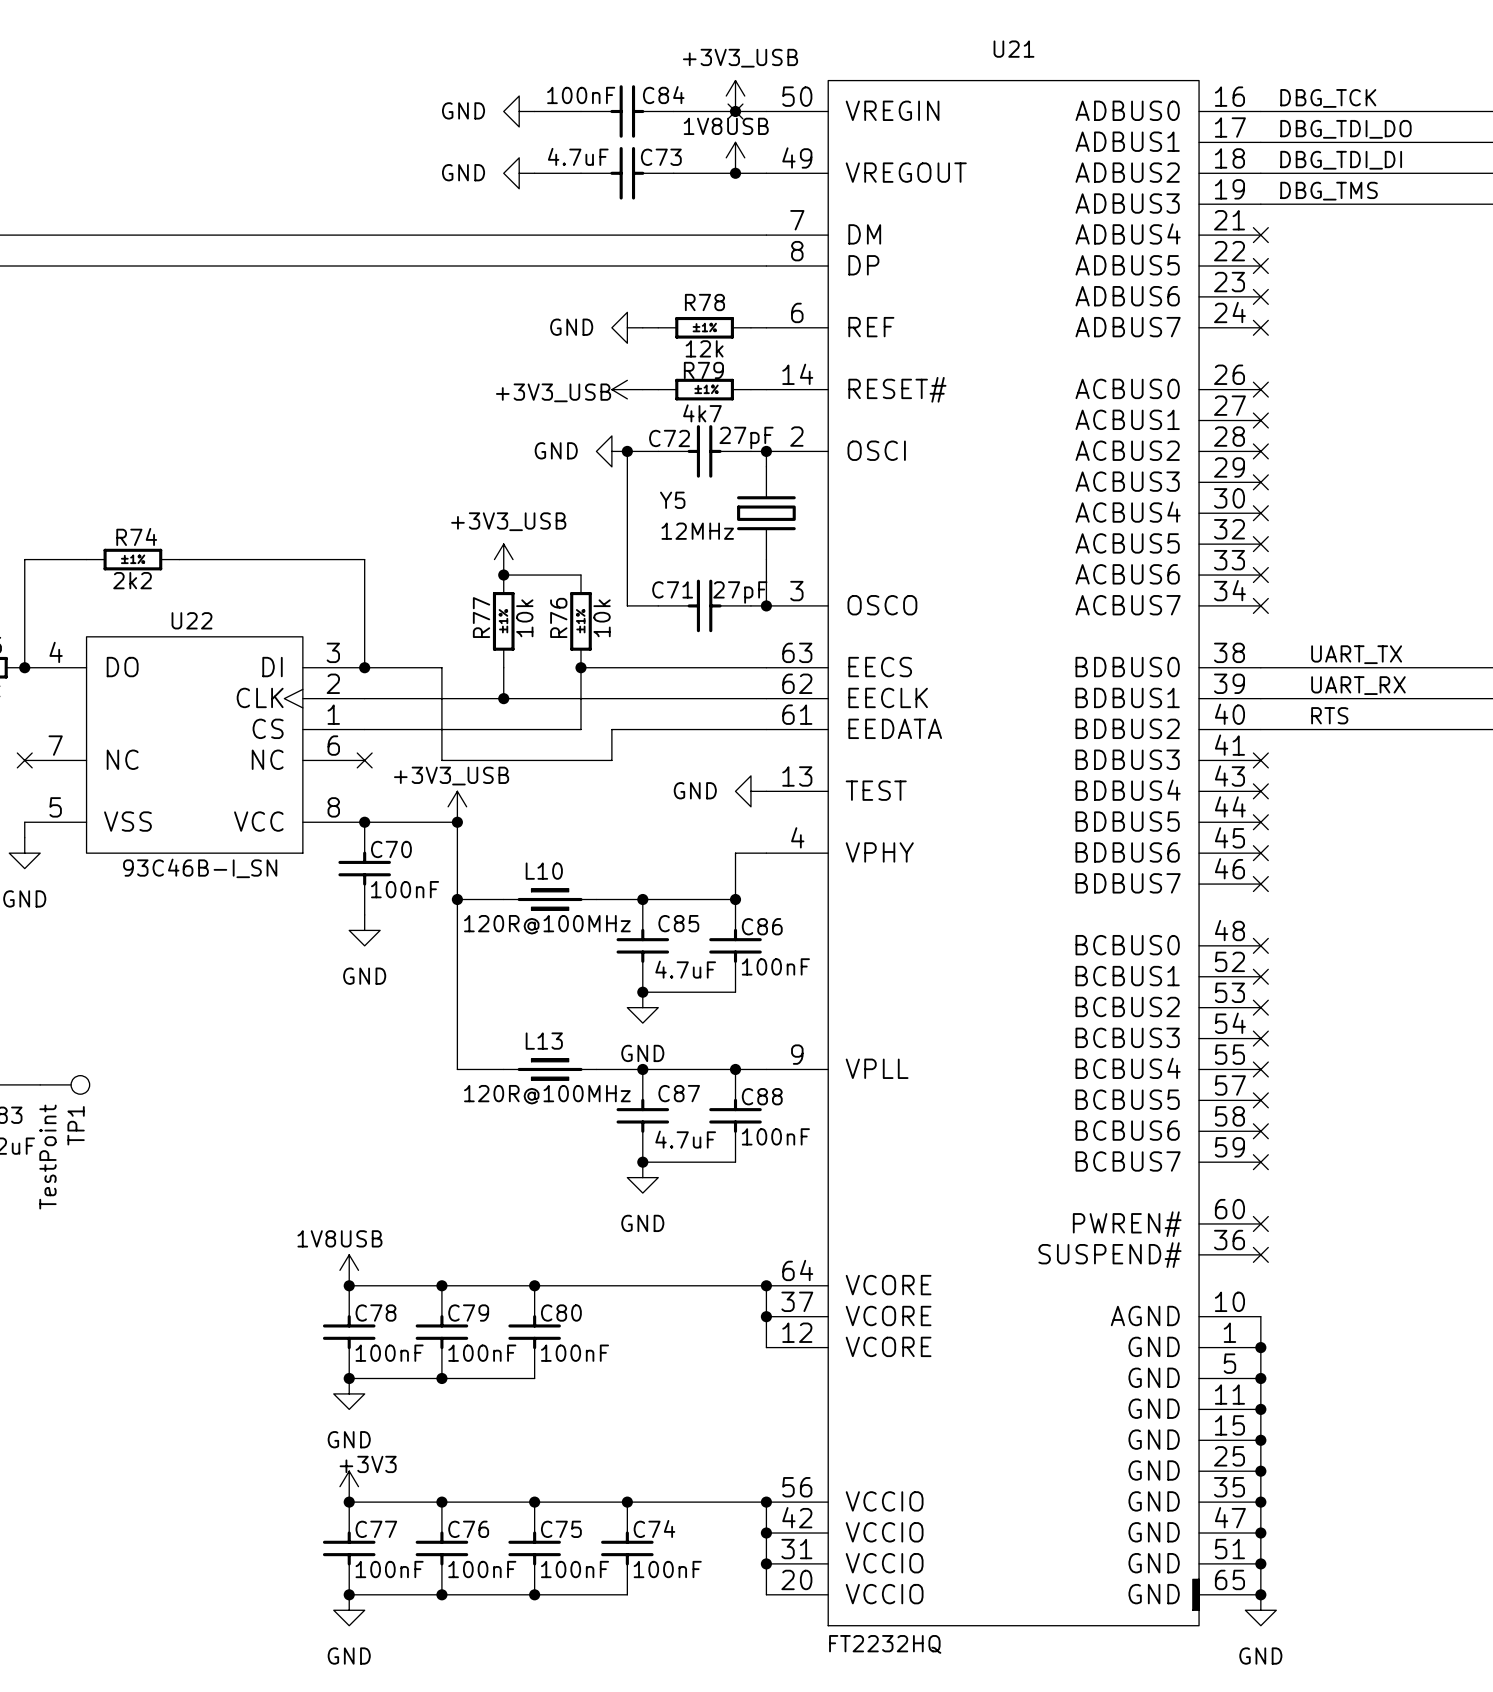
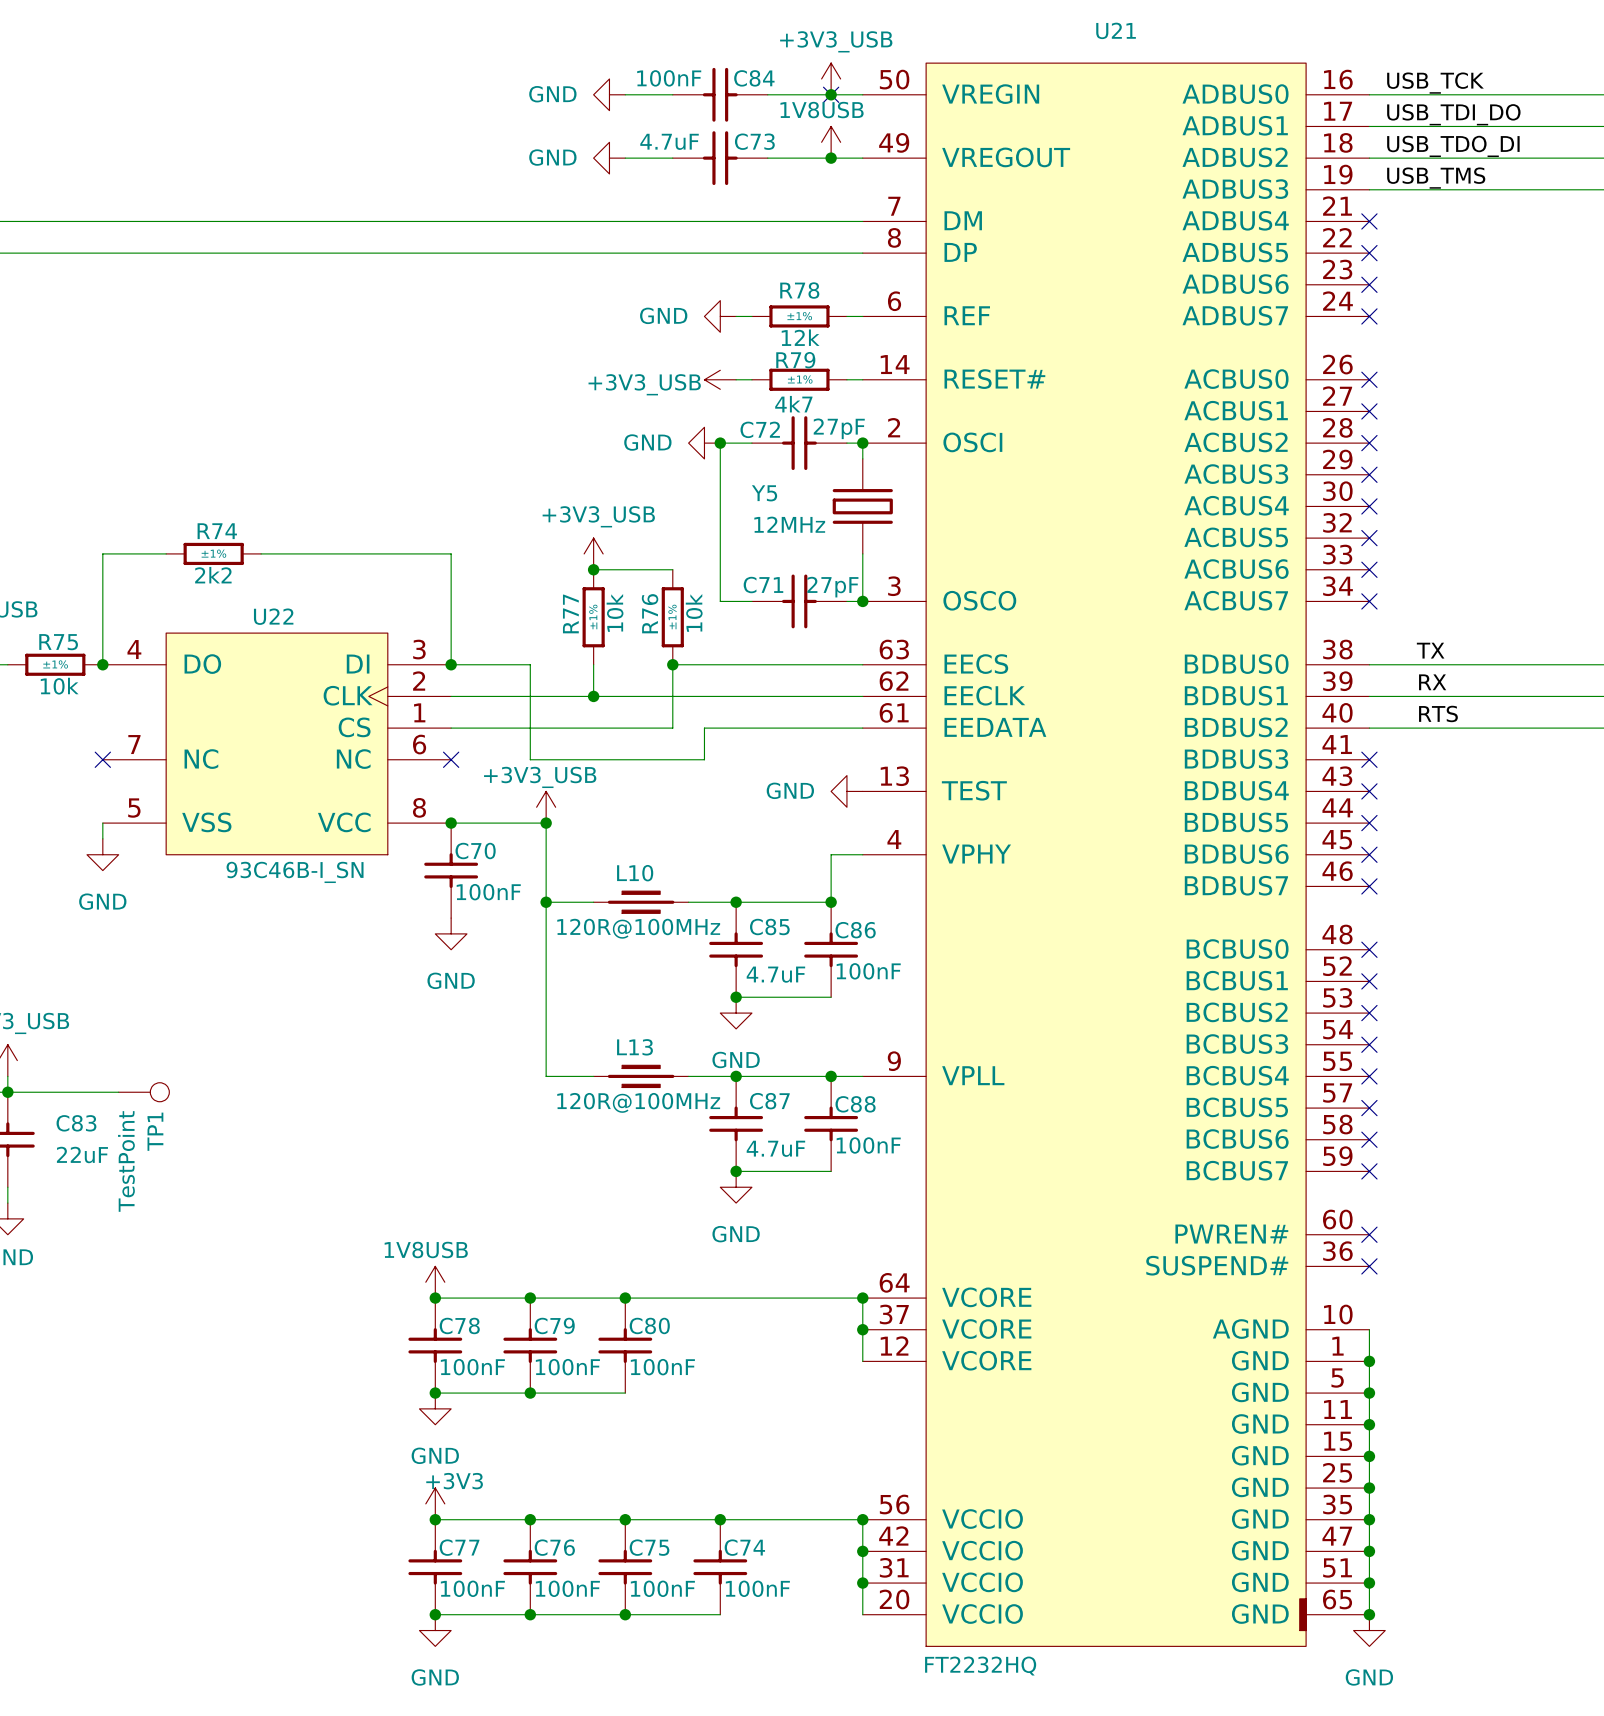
label: DBG_TCK (1328, 98) -> USB_TCK (1435, 83)
label: DBG_TDI_DO (1345, 129) -> USB_TDI_DO (1453, 114)
label: DBG_TDI_DI (1341, 160) -> USB_TDO_DI (1453, 146)
label: DBG_TMS (1329, 191) -> USB_TMS (1436, 178)
label: UART_TX (1356, 654) -> TX (1430, 650)
label: UART_RX (1358, 685) -> RX (1432, 682)

